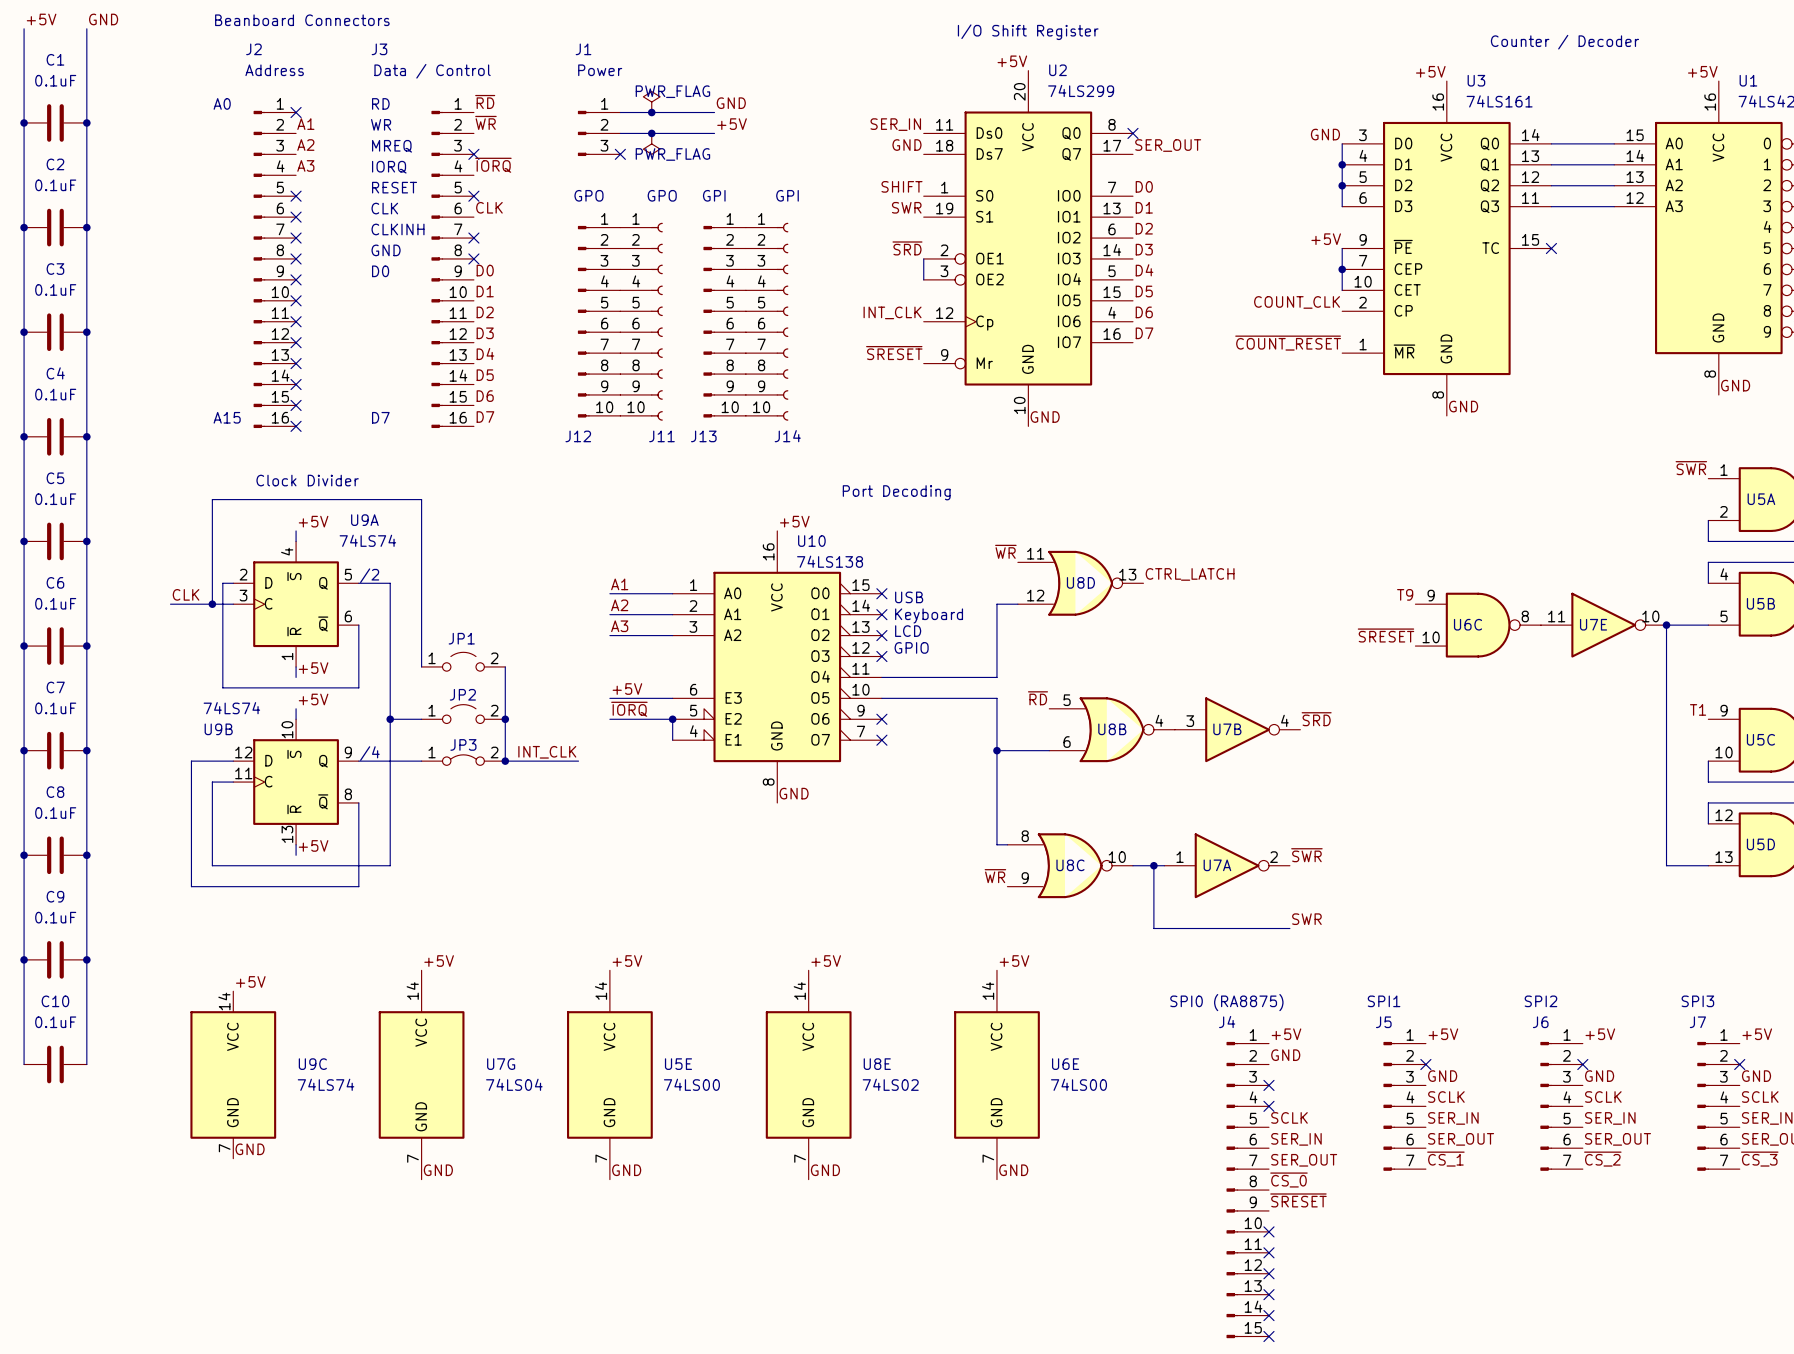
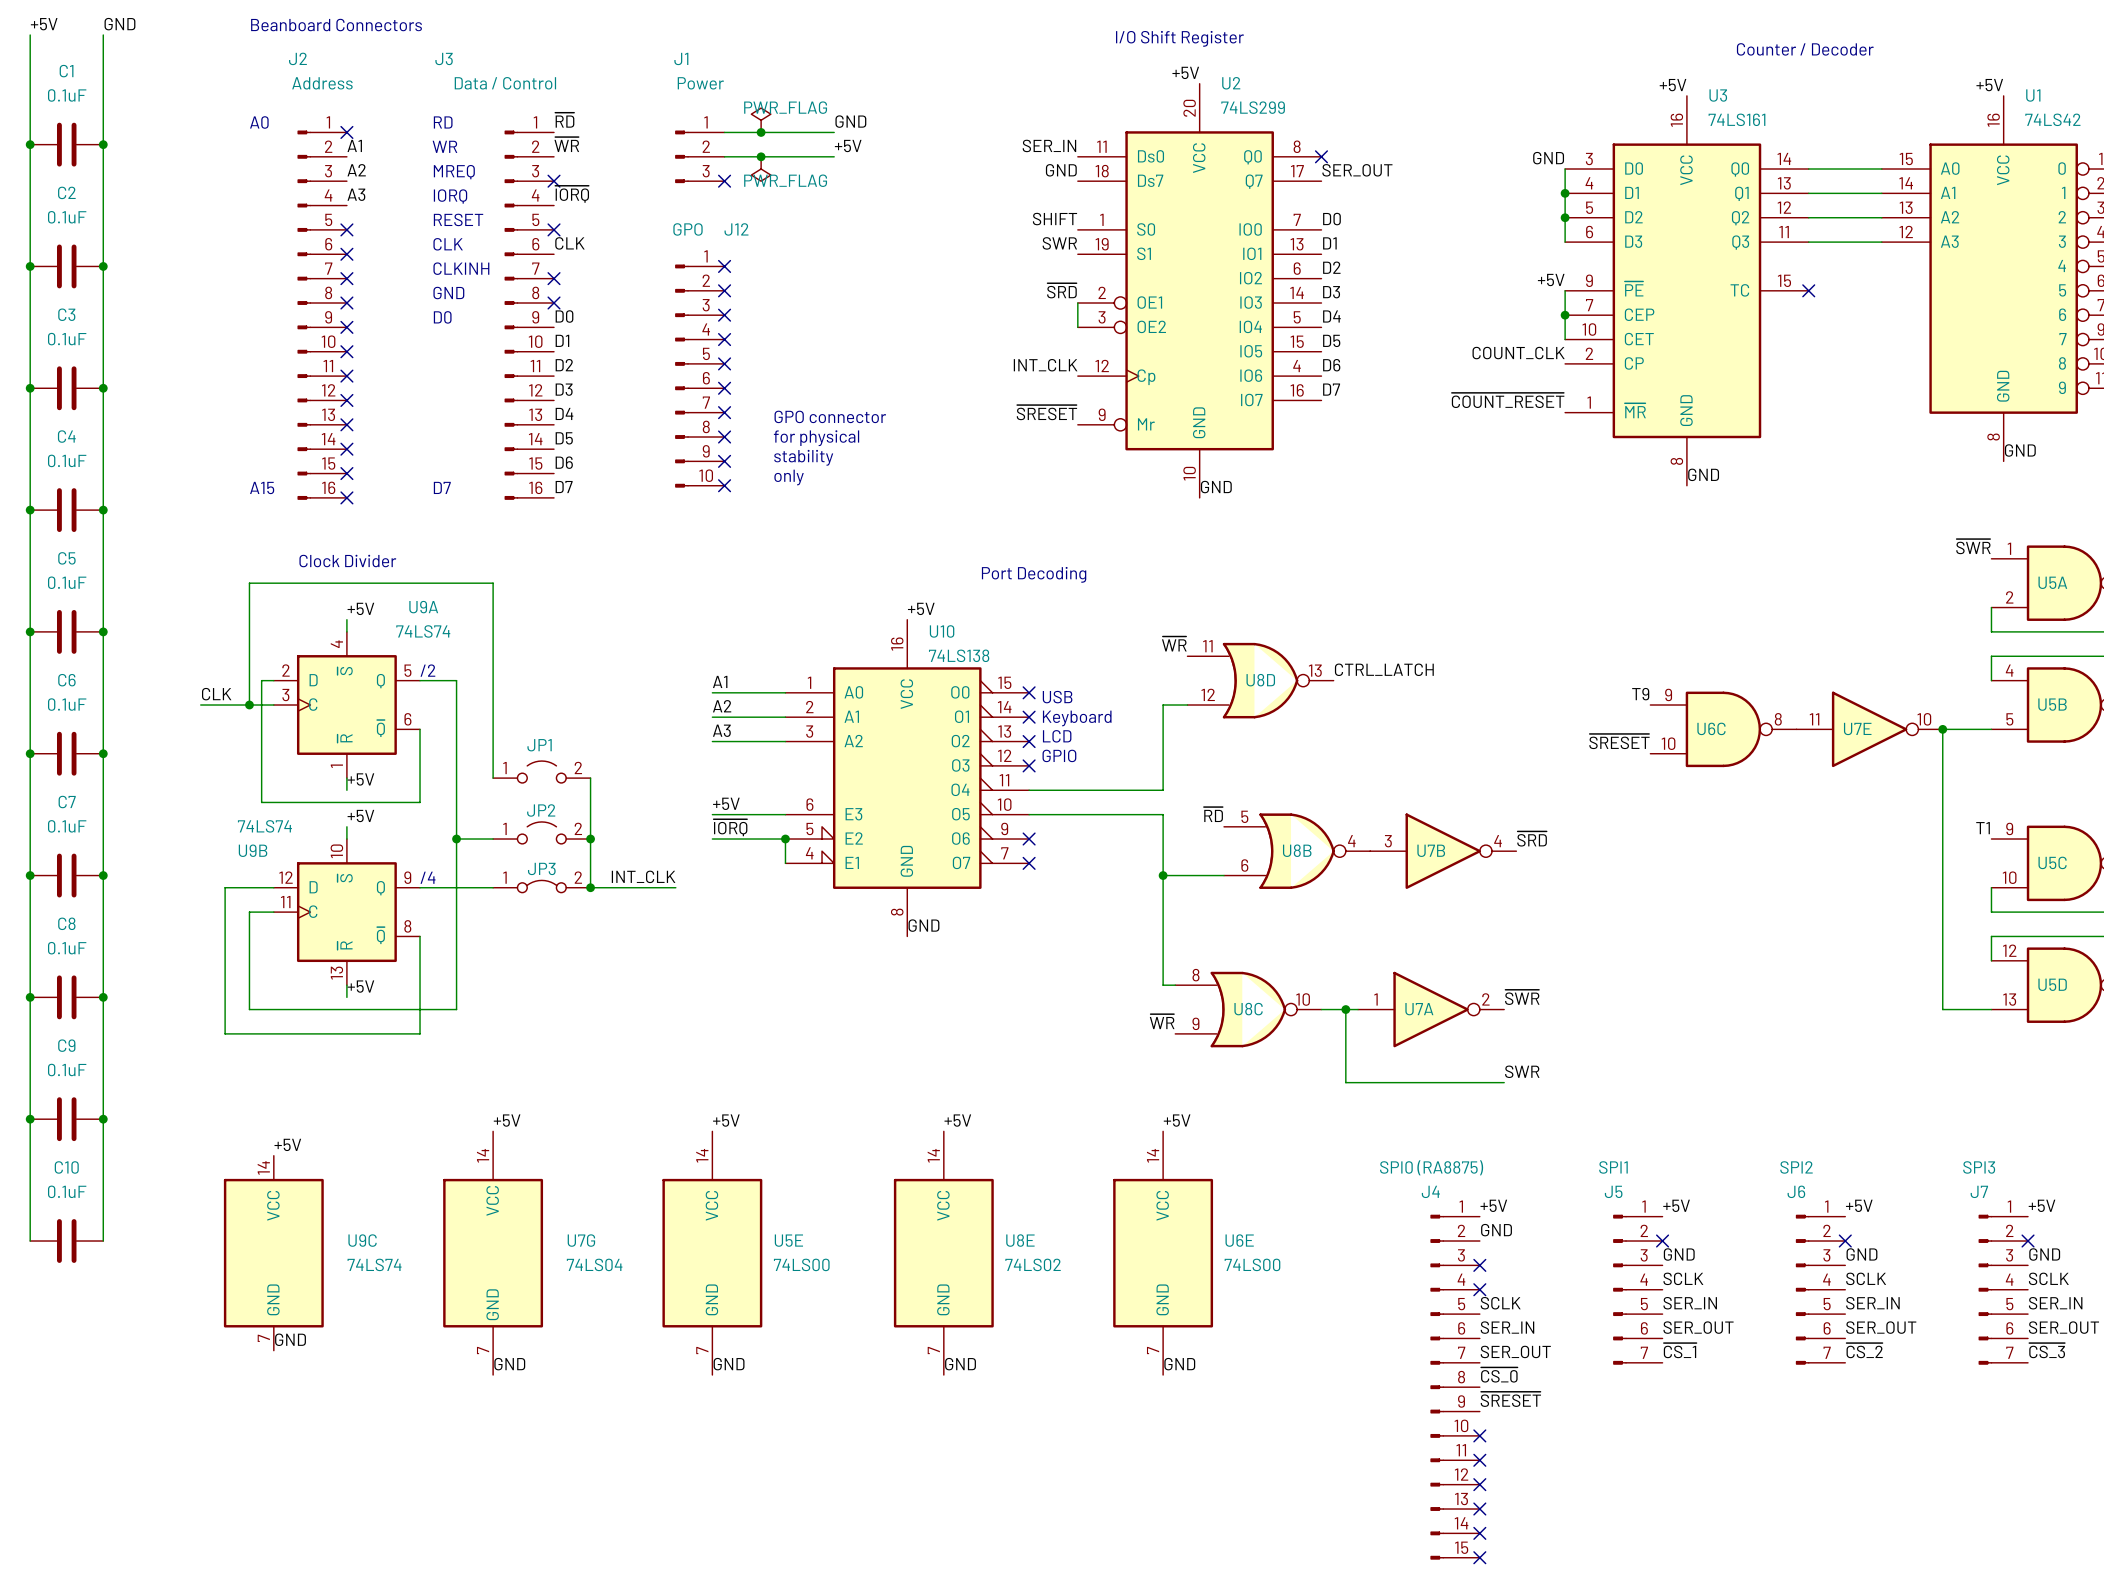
no-connect mark: none -> (724, 266)
no-connect mark: none -> (724, 290)
no-connect mark: none -> (724, 315)
no-connect mark: none -> (724, 339)
no-connect mark: none -> (724, 363)
J11: GPO (641, 321) -> none
J13: GPI (724, 321) -> none
J14: GPI (767, 321) -> none
no-connect mark: none -> (724, 388)
no-connect mark: none -> (724, 412)
text: none -> GPO connector (830, 416)
no-connect mark: none -> (724, 437)
text: none -> for physical (816, 438)
text: none -> stability (803, 457)
no-connect mark: none -> (724, 461)
text: none -> only (789, 477)
no-connect mark: none -> (724, 485)
J12 name position: J12 (578, 436) -> J12 (736, 229)

